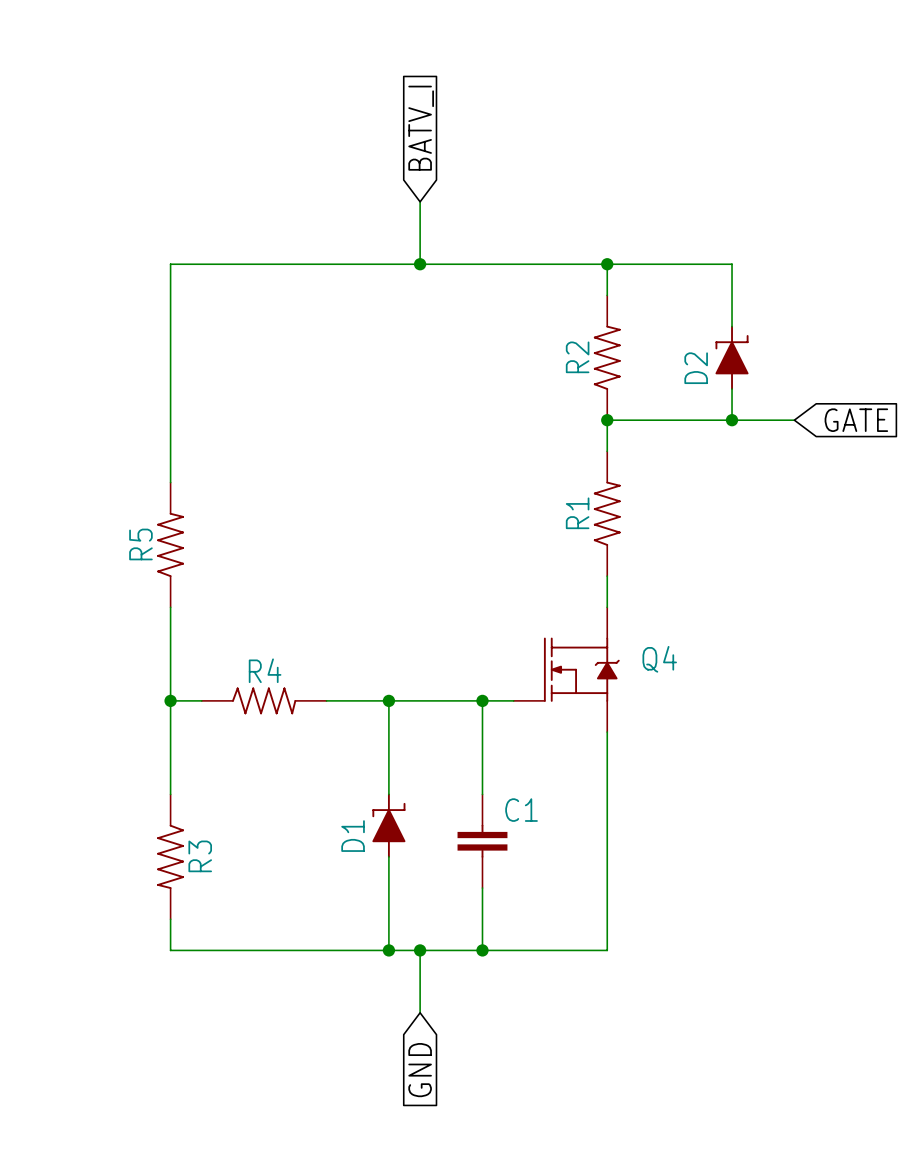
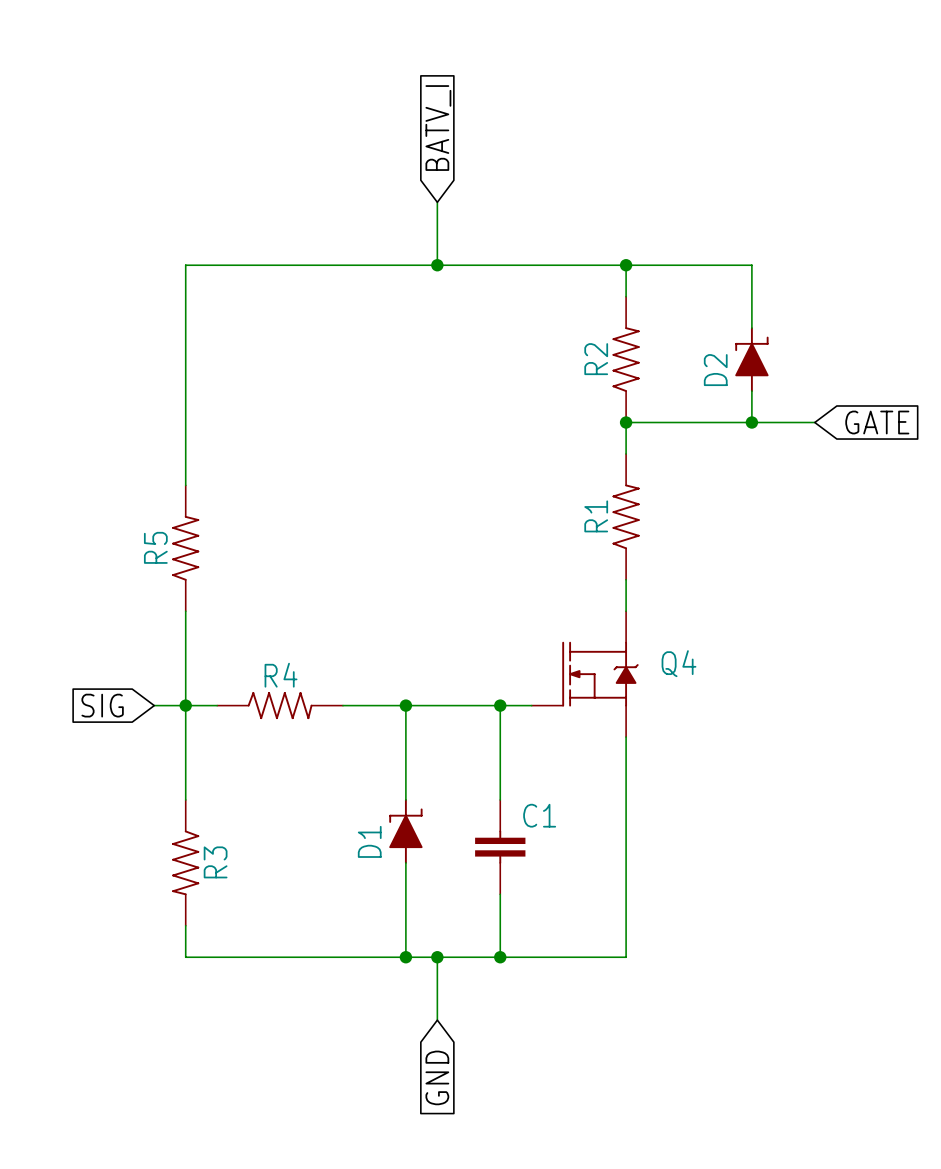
global label: none -> SIG (102, 705)
wire: none -> (154, 705) (185, 705)

